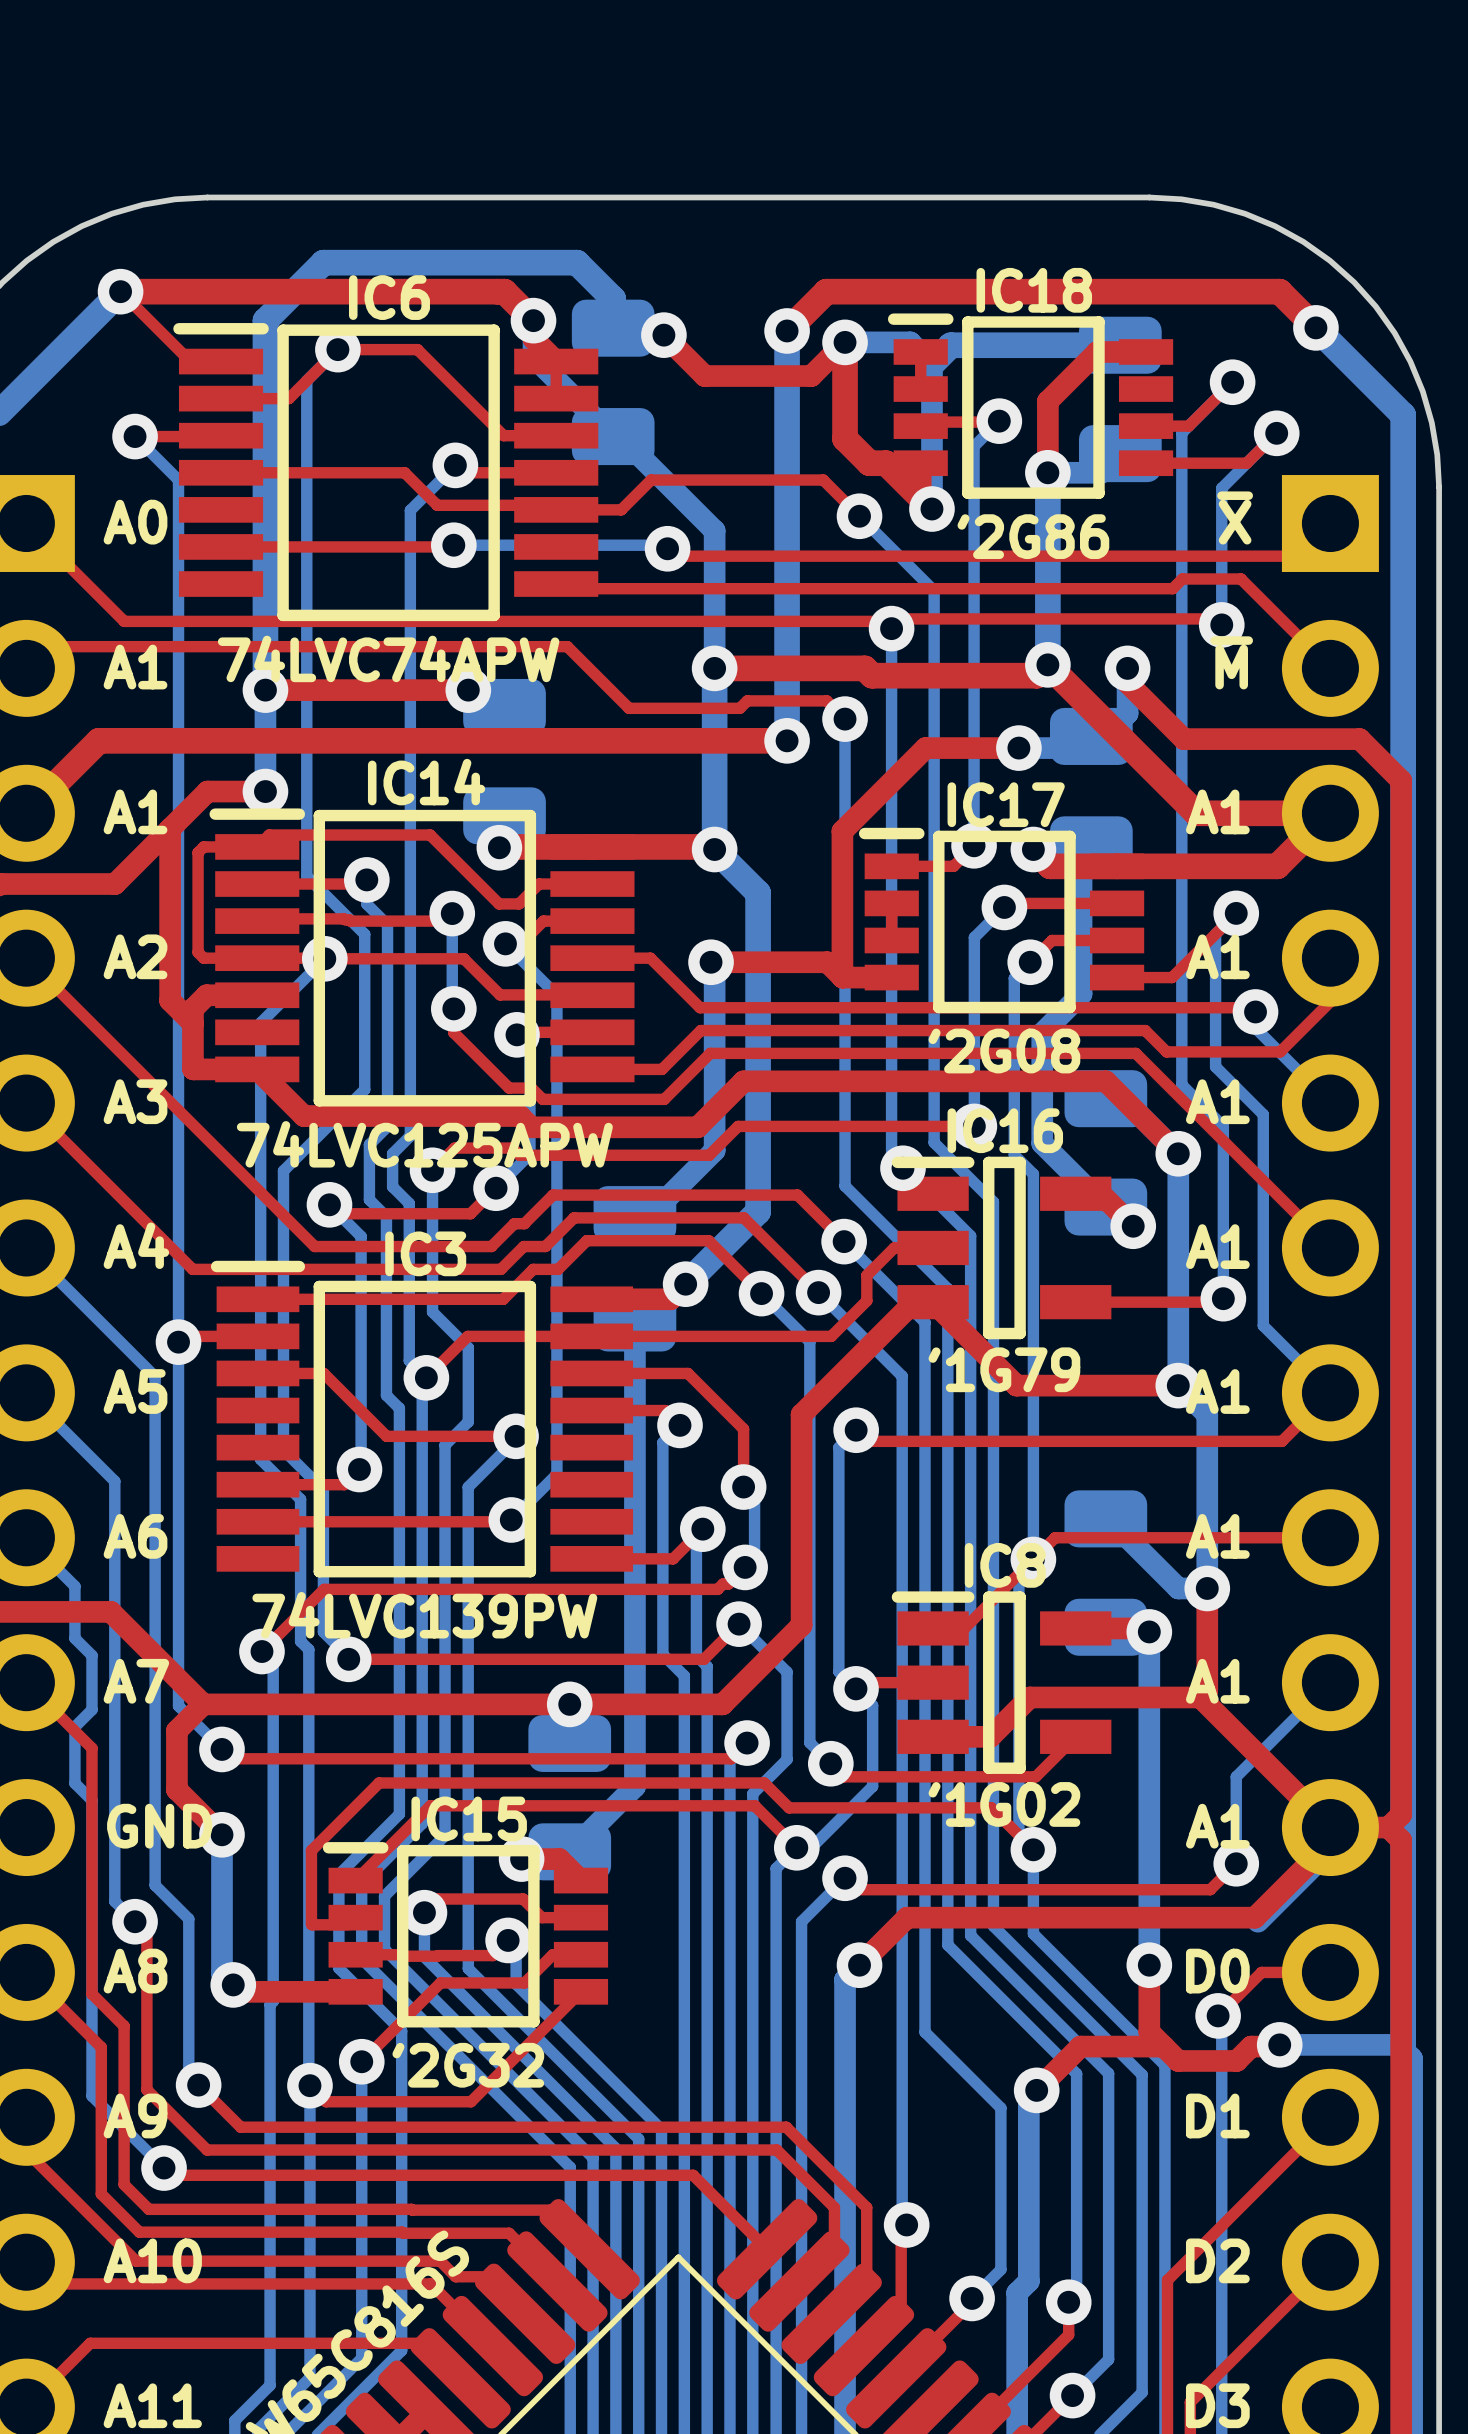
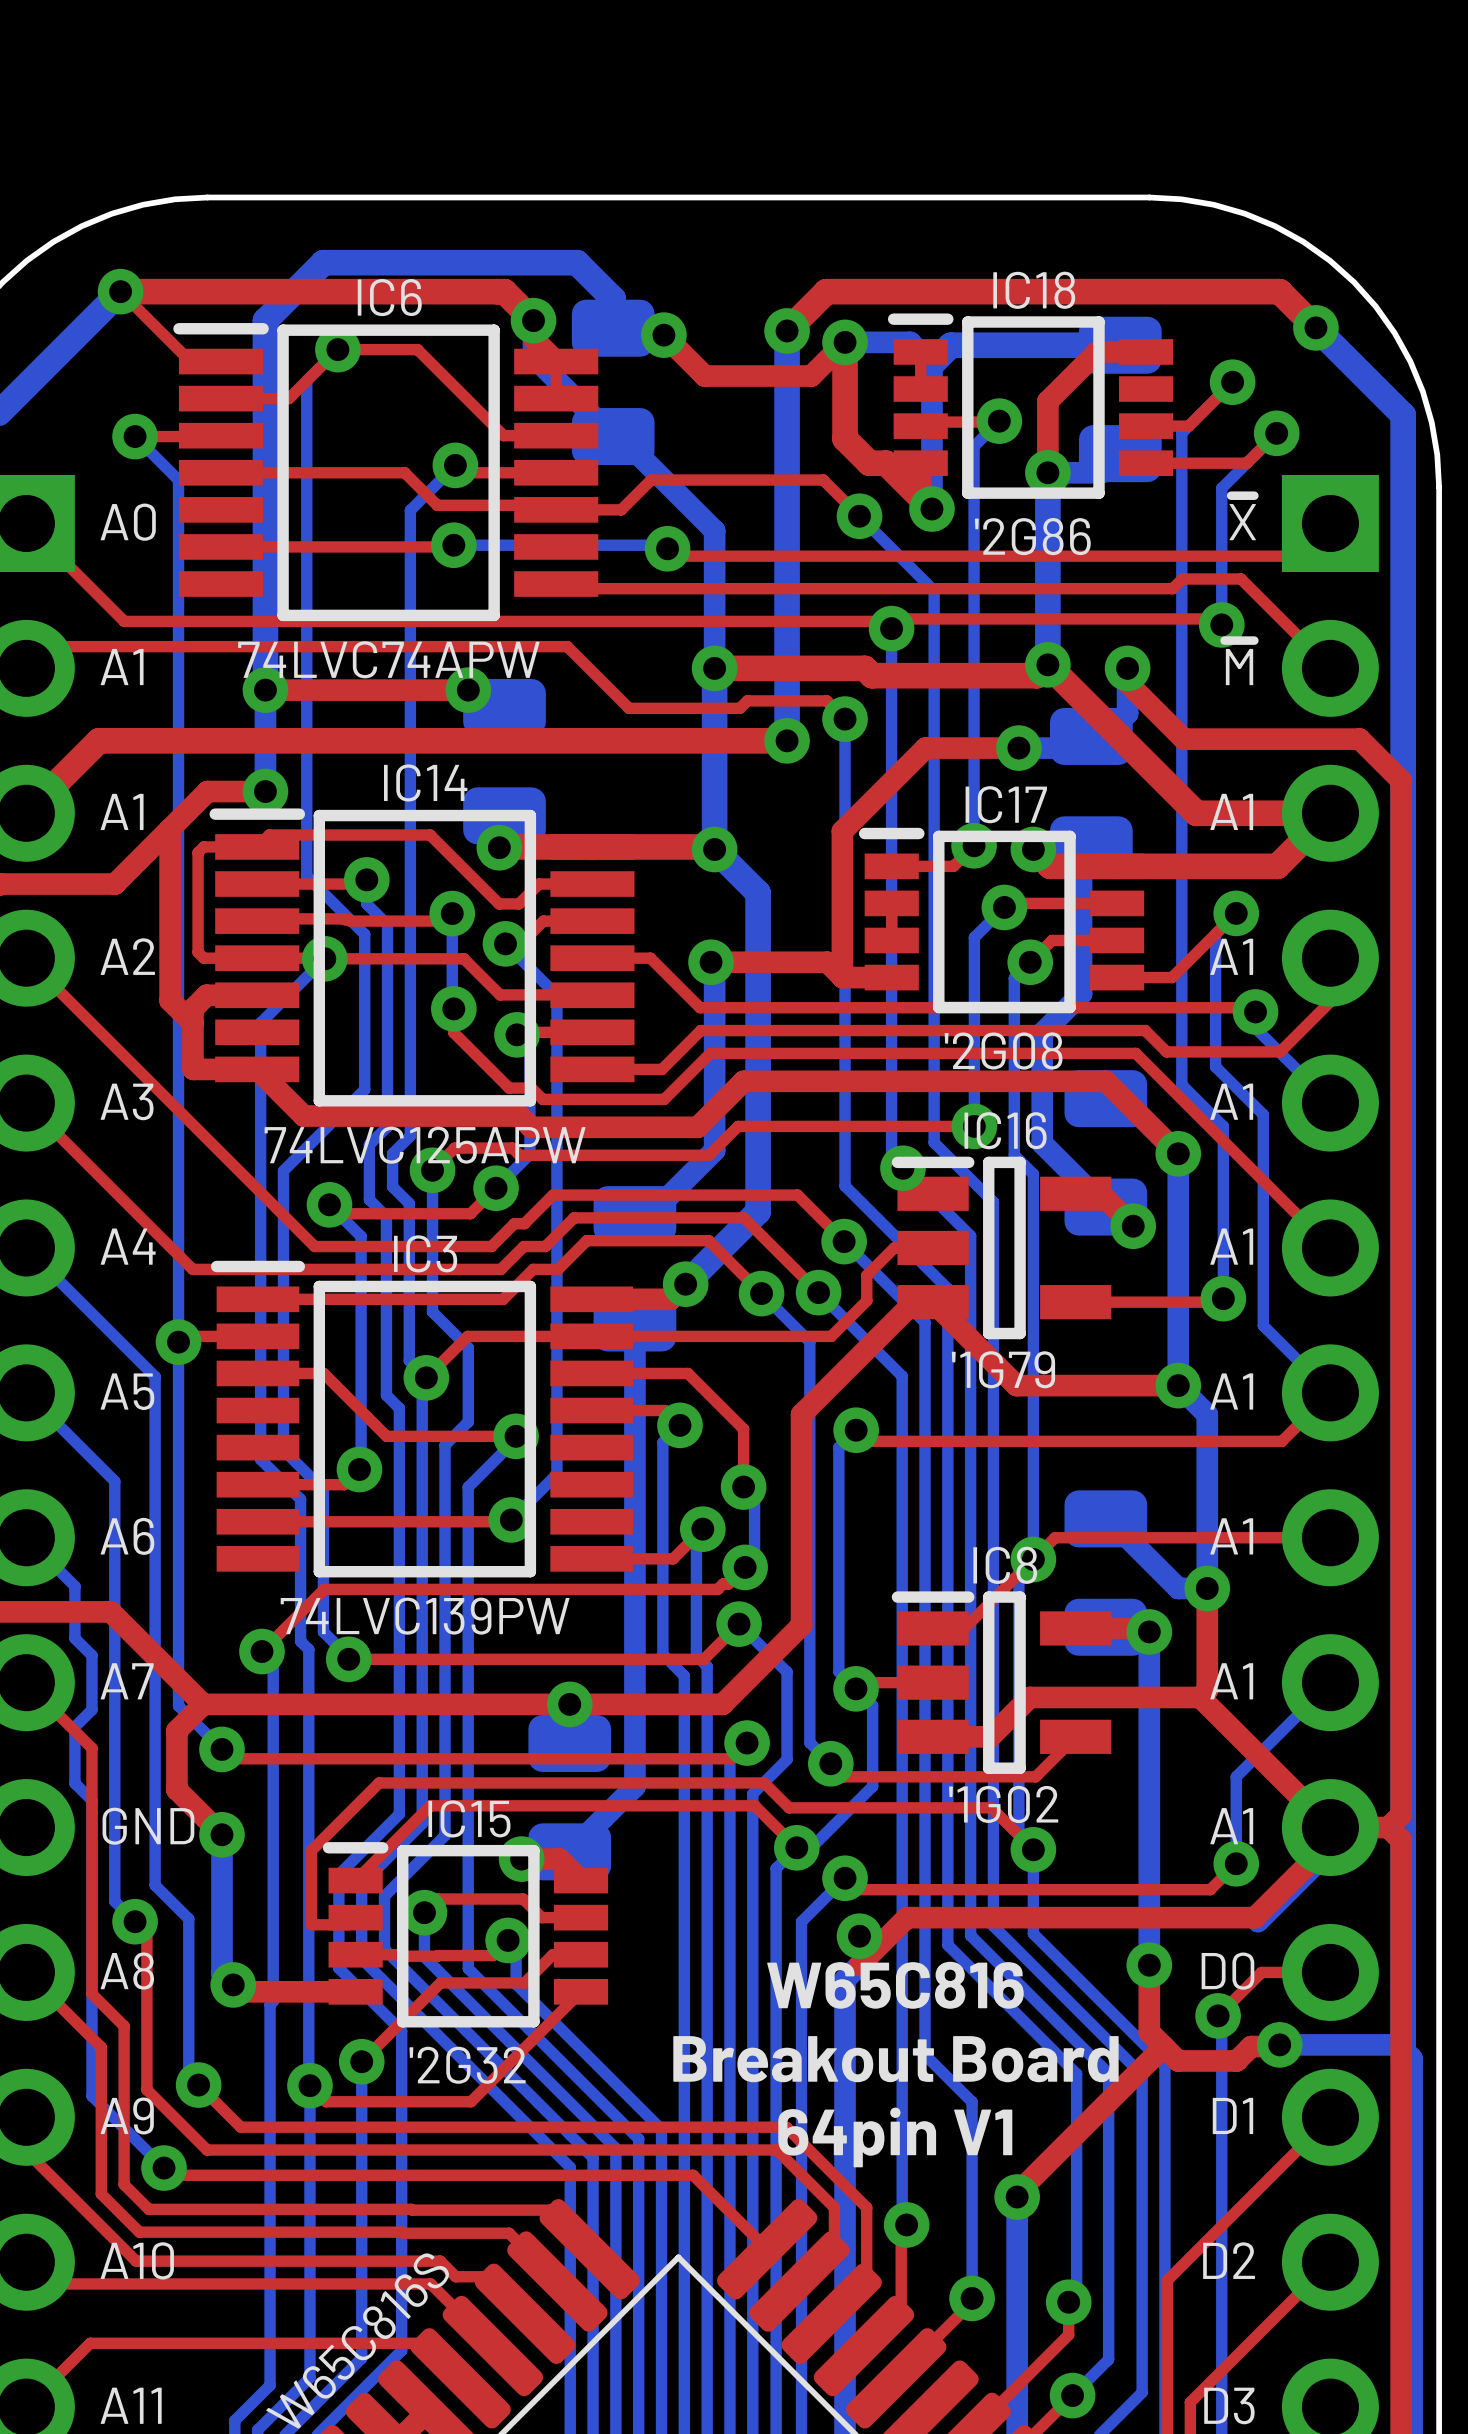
via position: (859, 1965) -> (859, 1936)
text: none -> W65C816 (895, 1985)
bottom track: (925, 2032) (1000, 2108) (1000, 2269) (972, 2298) -> (925, 2032) (925, 2054) (972, 2101) (972, 2298)
top track: (1163, 2046) (1080, 2046) (1036, 2090) -> (1163, 2046) (1017, 2193) (1017, 2197)
text: none -> Breakout Board (895, 2059)
bottom track: (1036, 2090) (1028, 2098) (1028, 2281) (1017, 2292) -> (1017, 2197) (1017, 2292)
via position: (1036, 2090) -> (1017, 2197)
text: none -> 64pin V1 (895, 2137)

